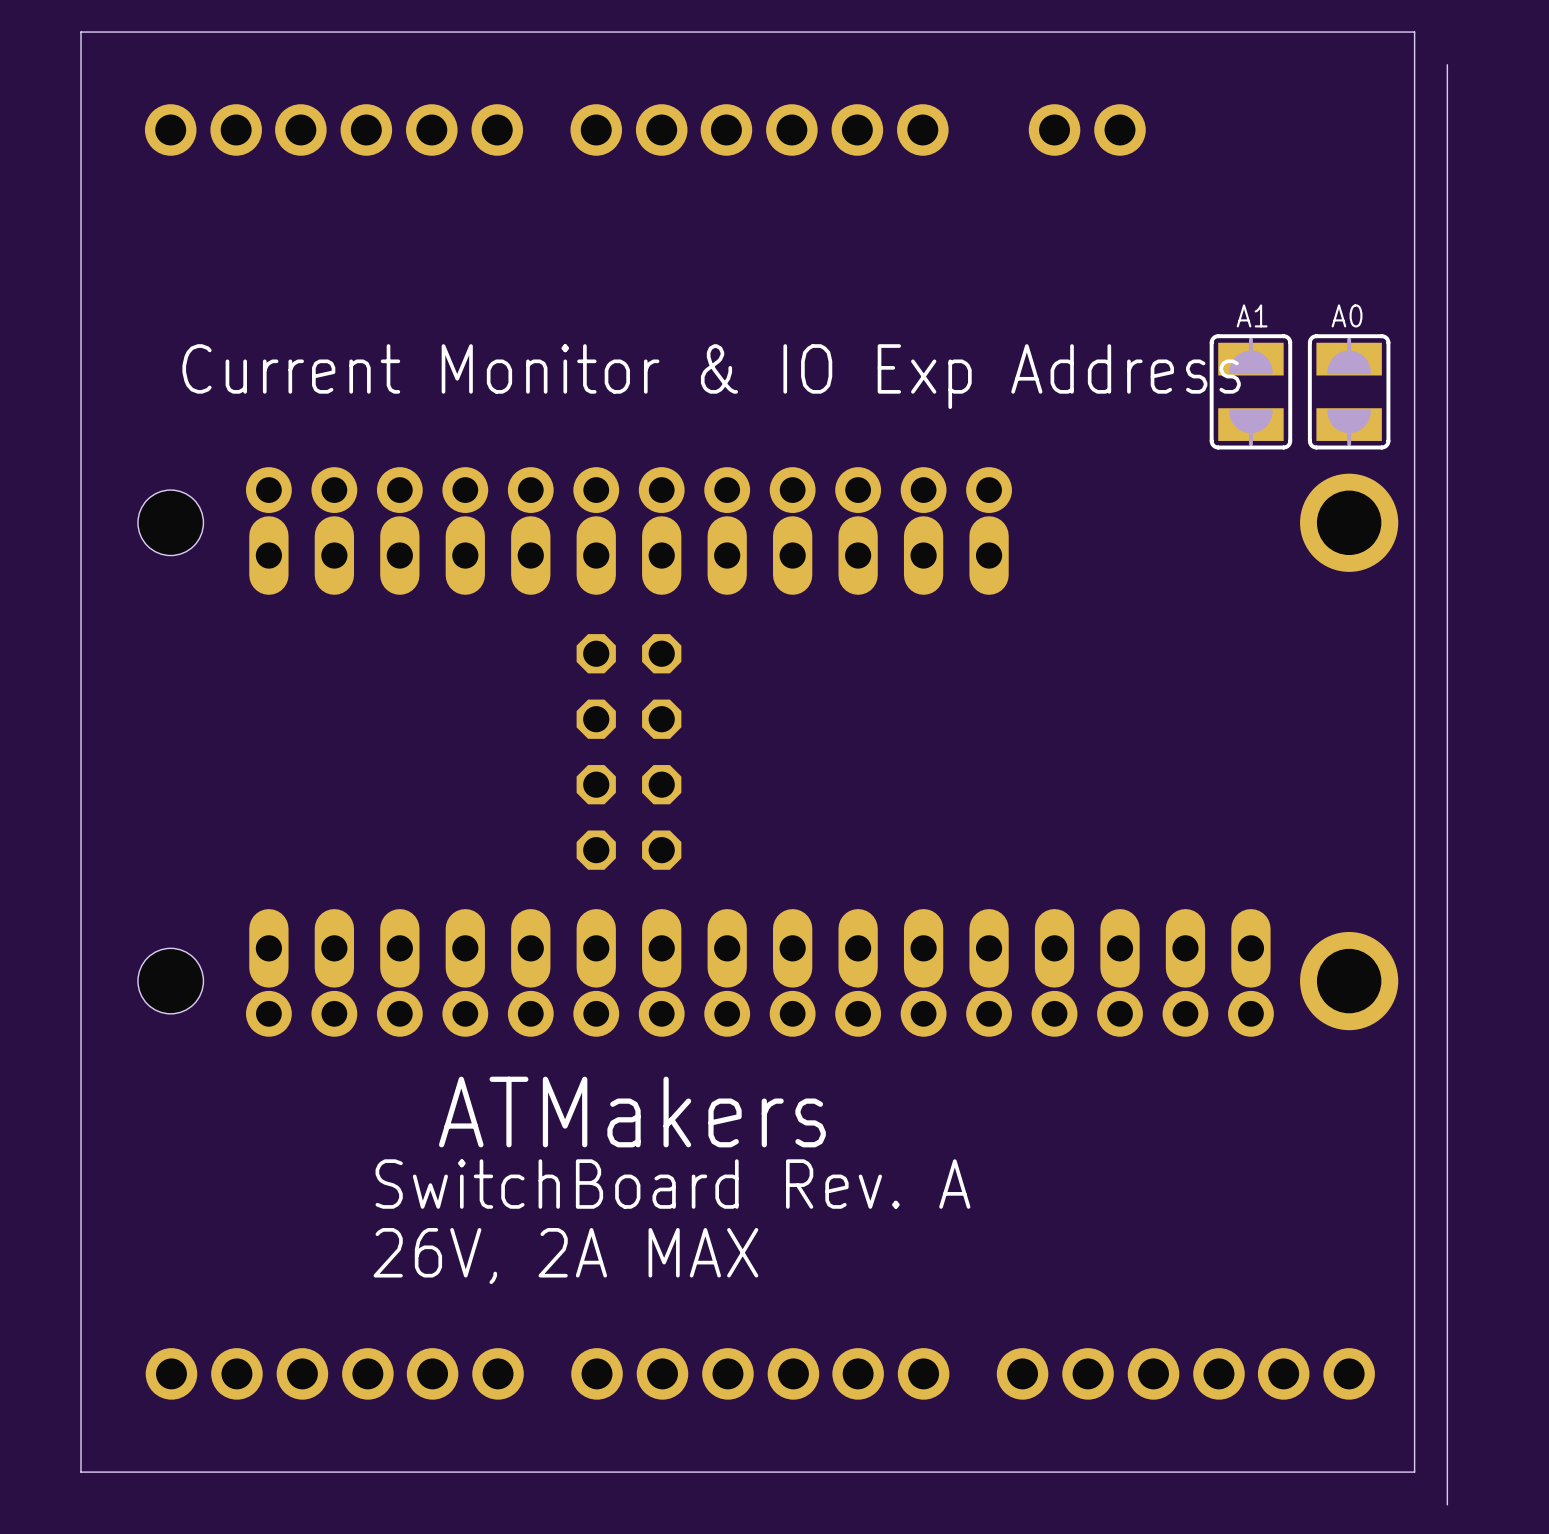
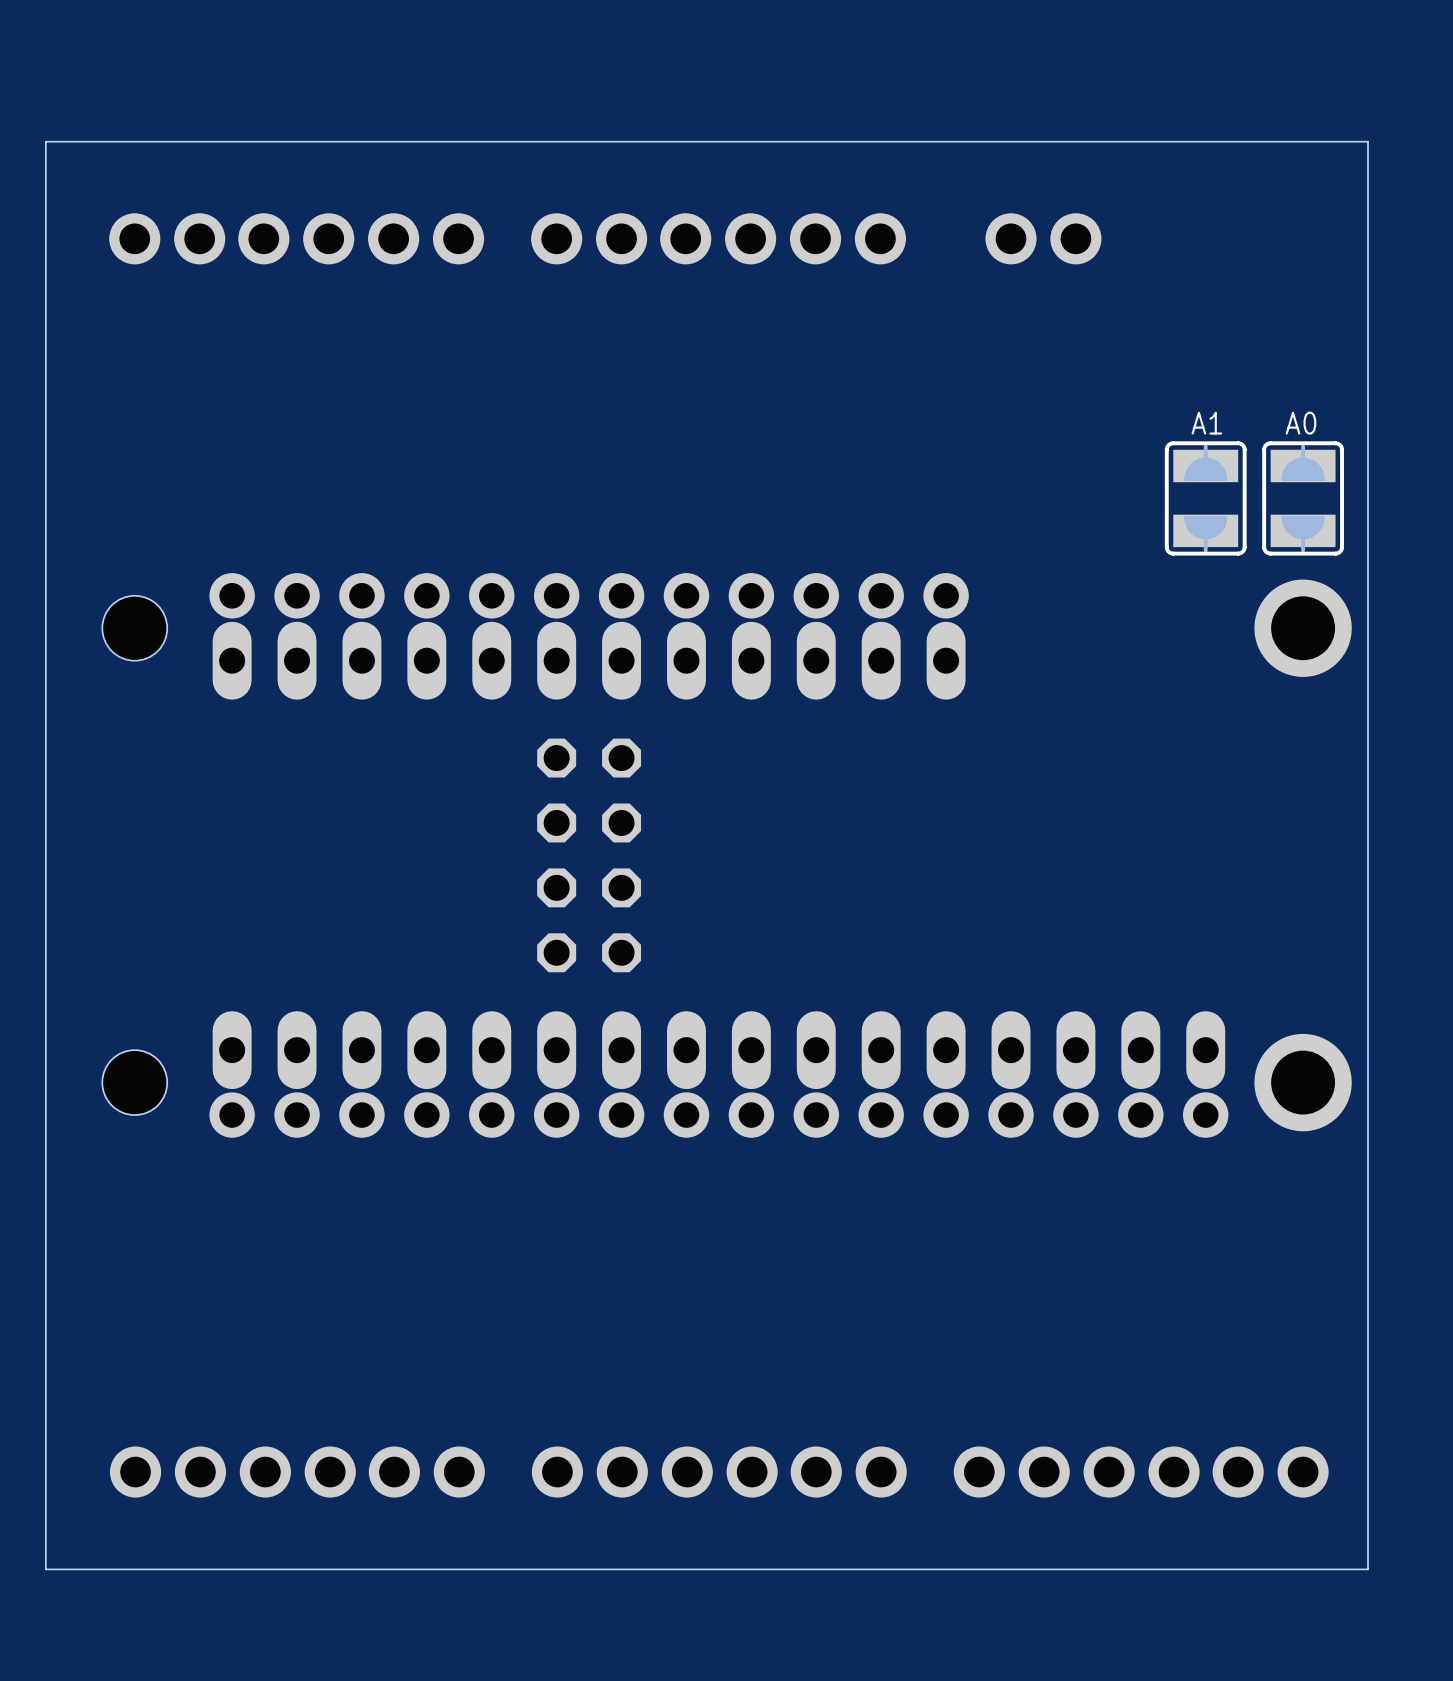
board edge: (1447, 64) (1447, 1504) -> none
text: Current Monitor & IO Exp Address (711, 376) -> none
text: ATMakers (632, 1112) -> none
text: SwitchBoard Rev. A (672, 1184) -> none
text: 26V, 2A MAX (565, 1256) -> none

